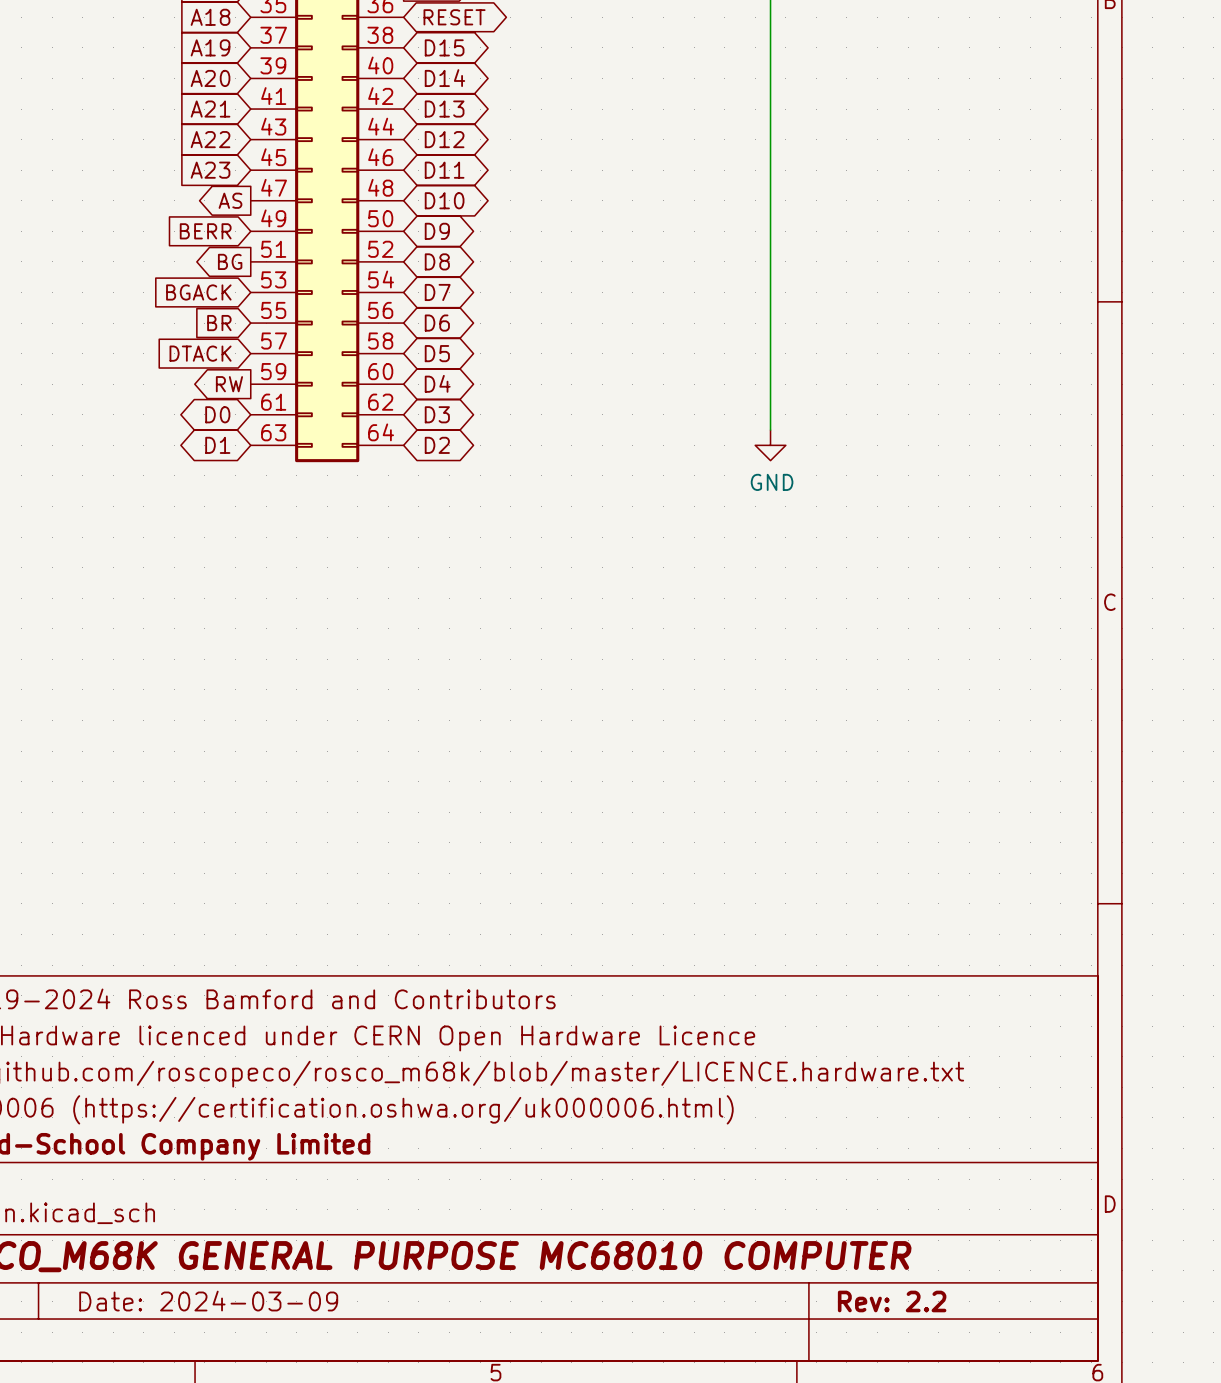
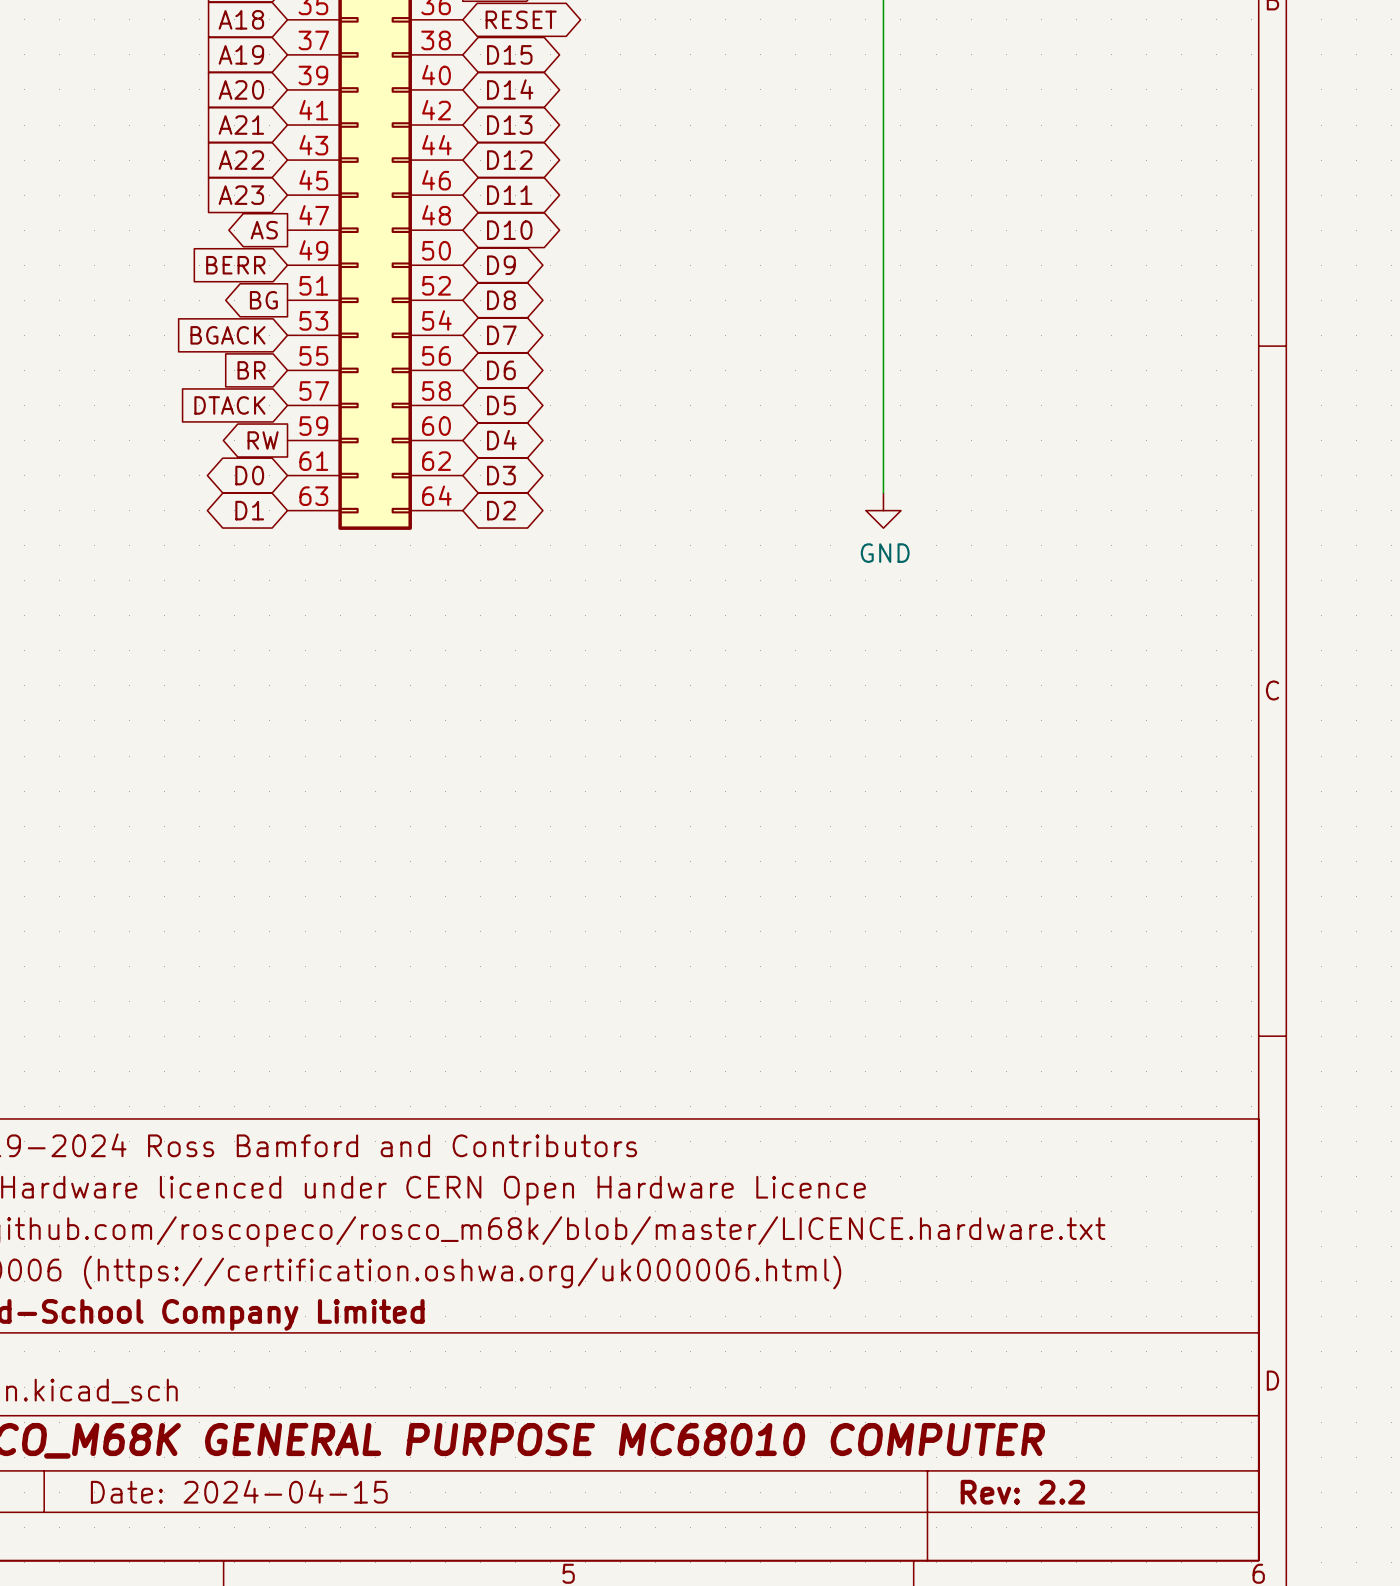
title block: Date: 2024-03-09 (208, 1301) -> Date: 2024-04-15 (239, 1491)

